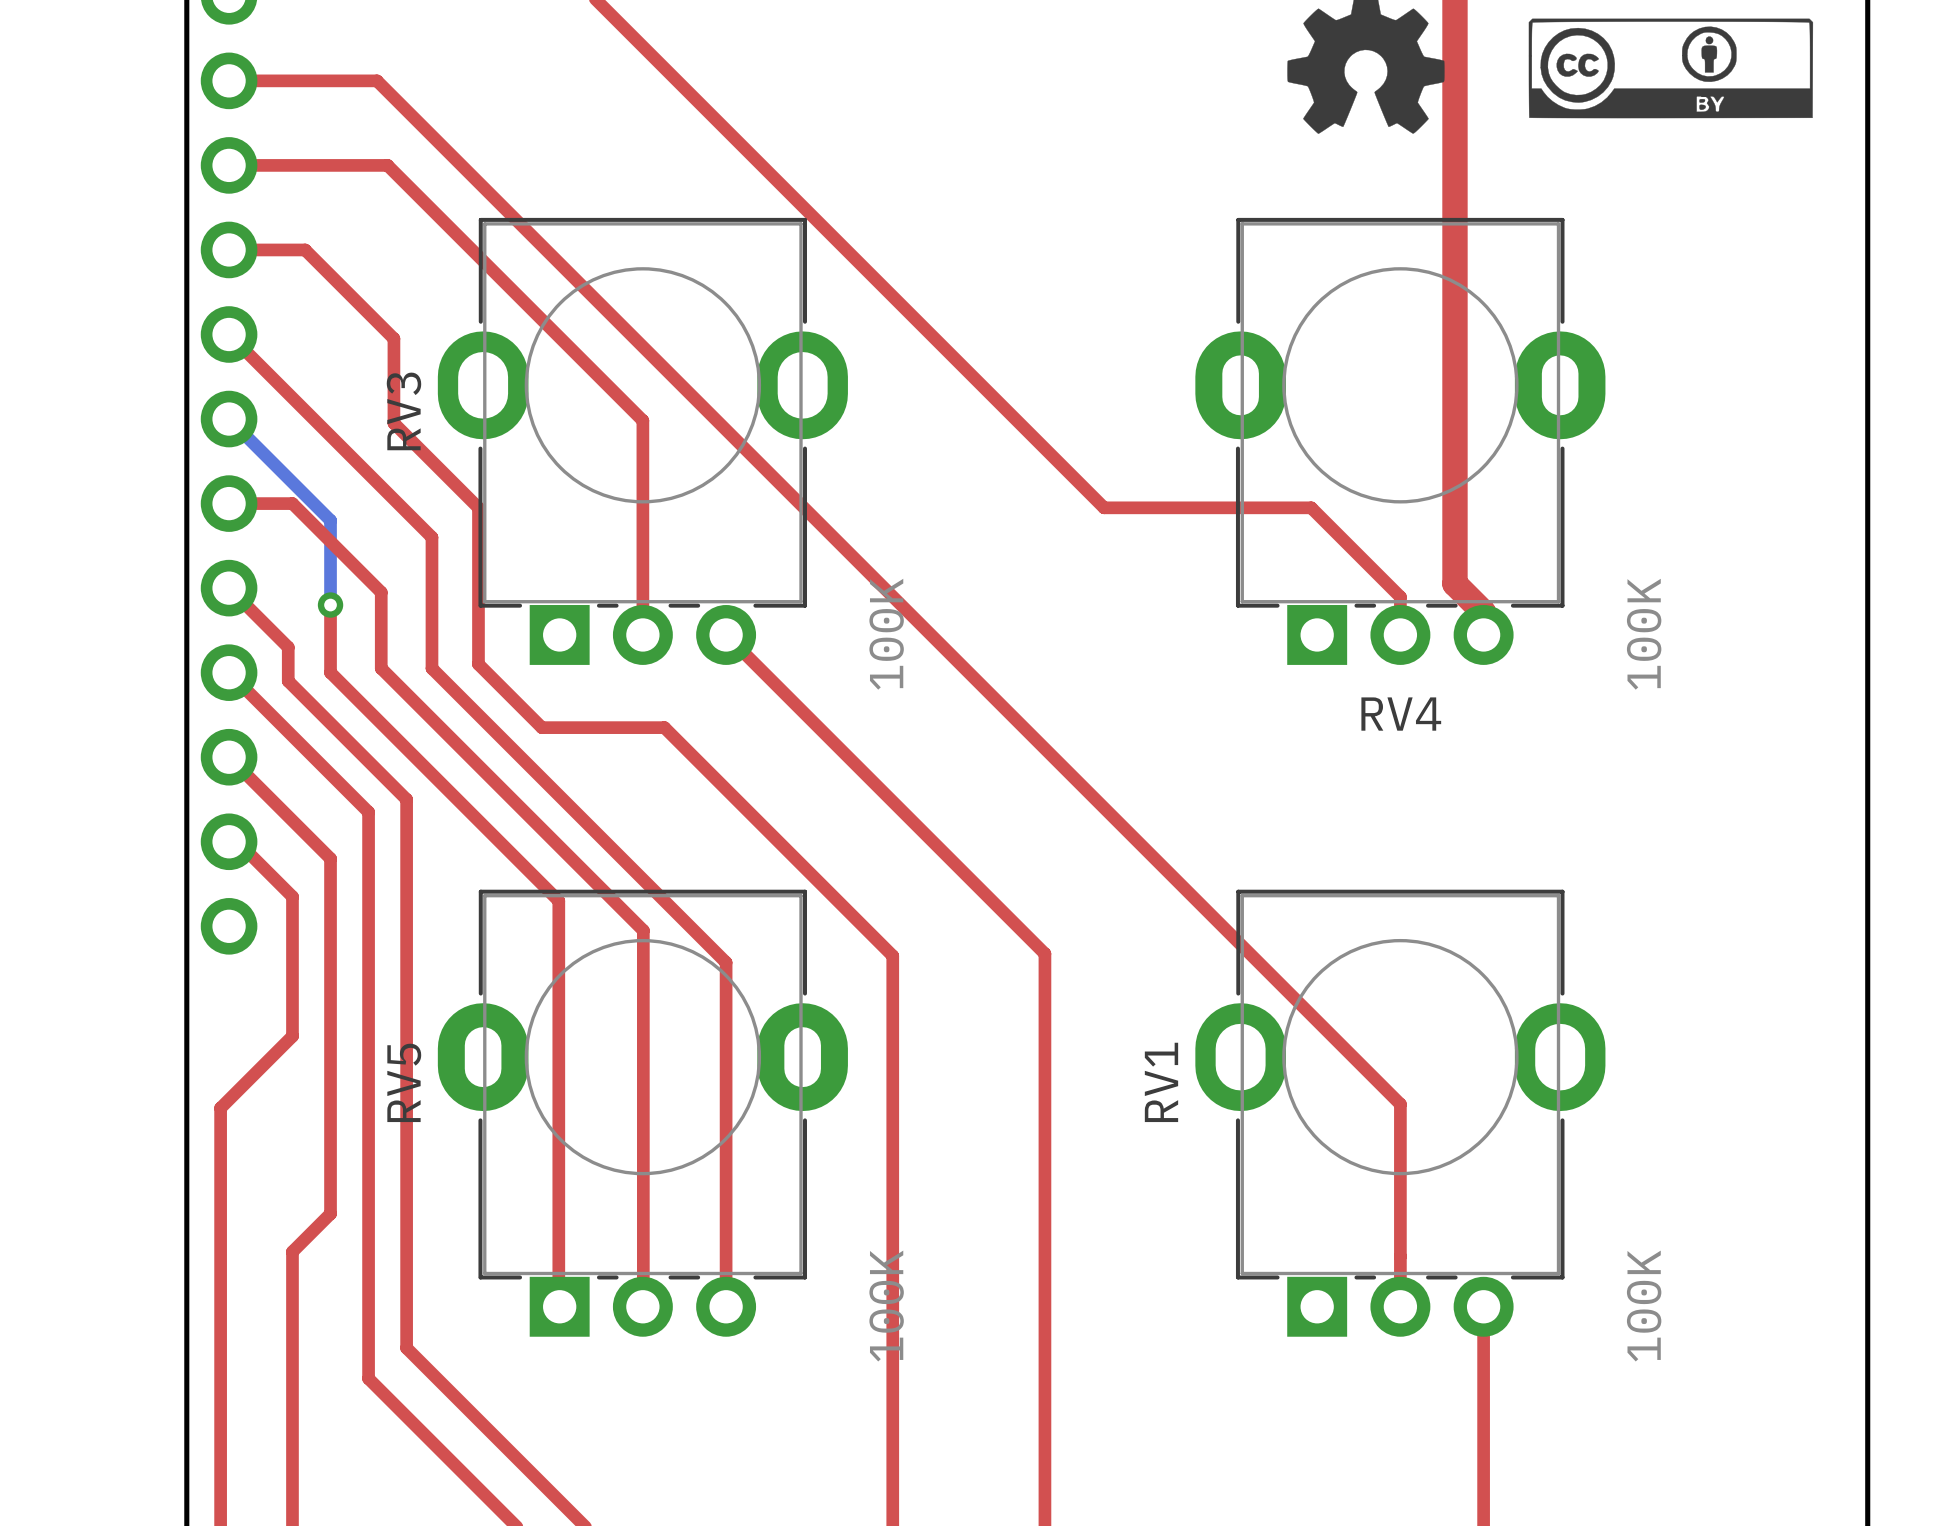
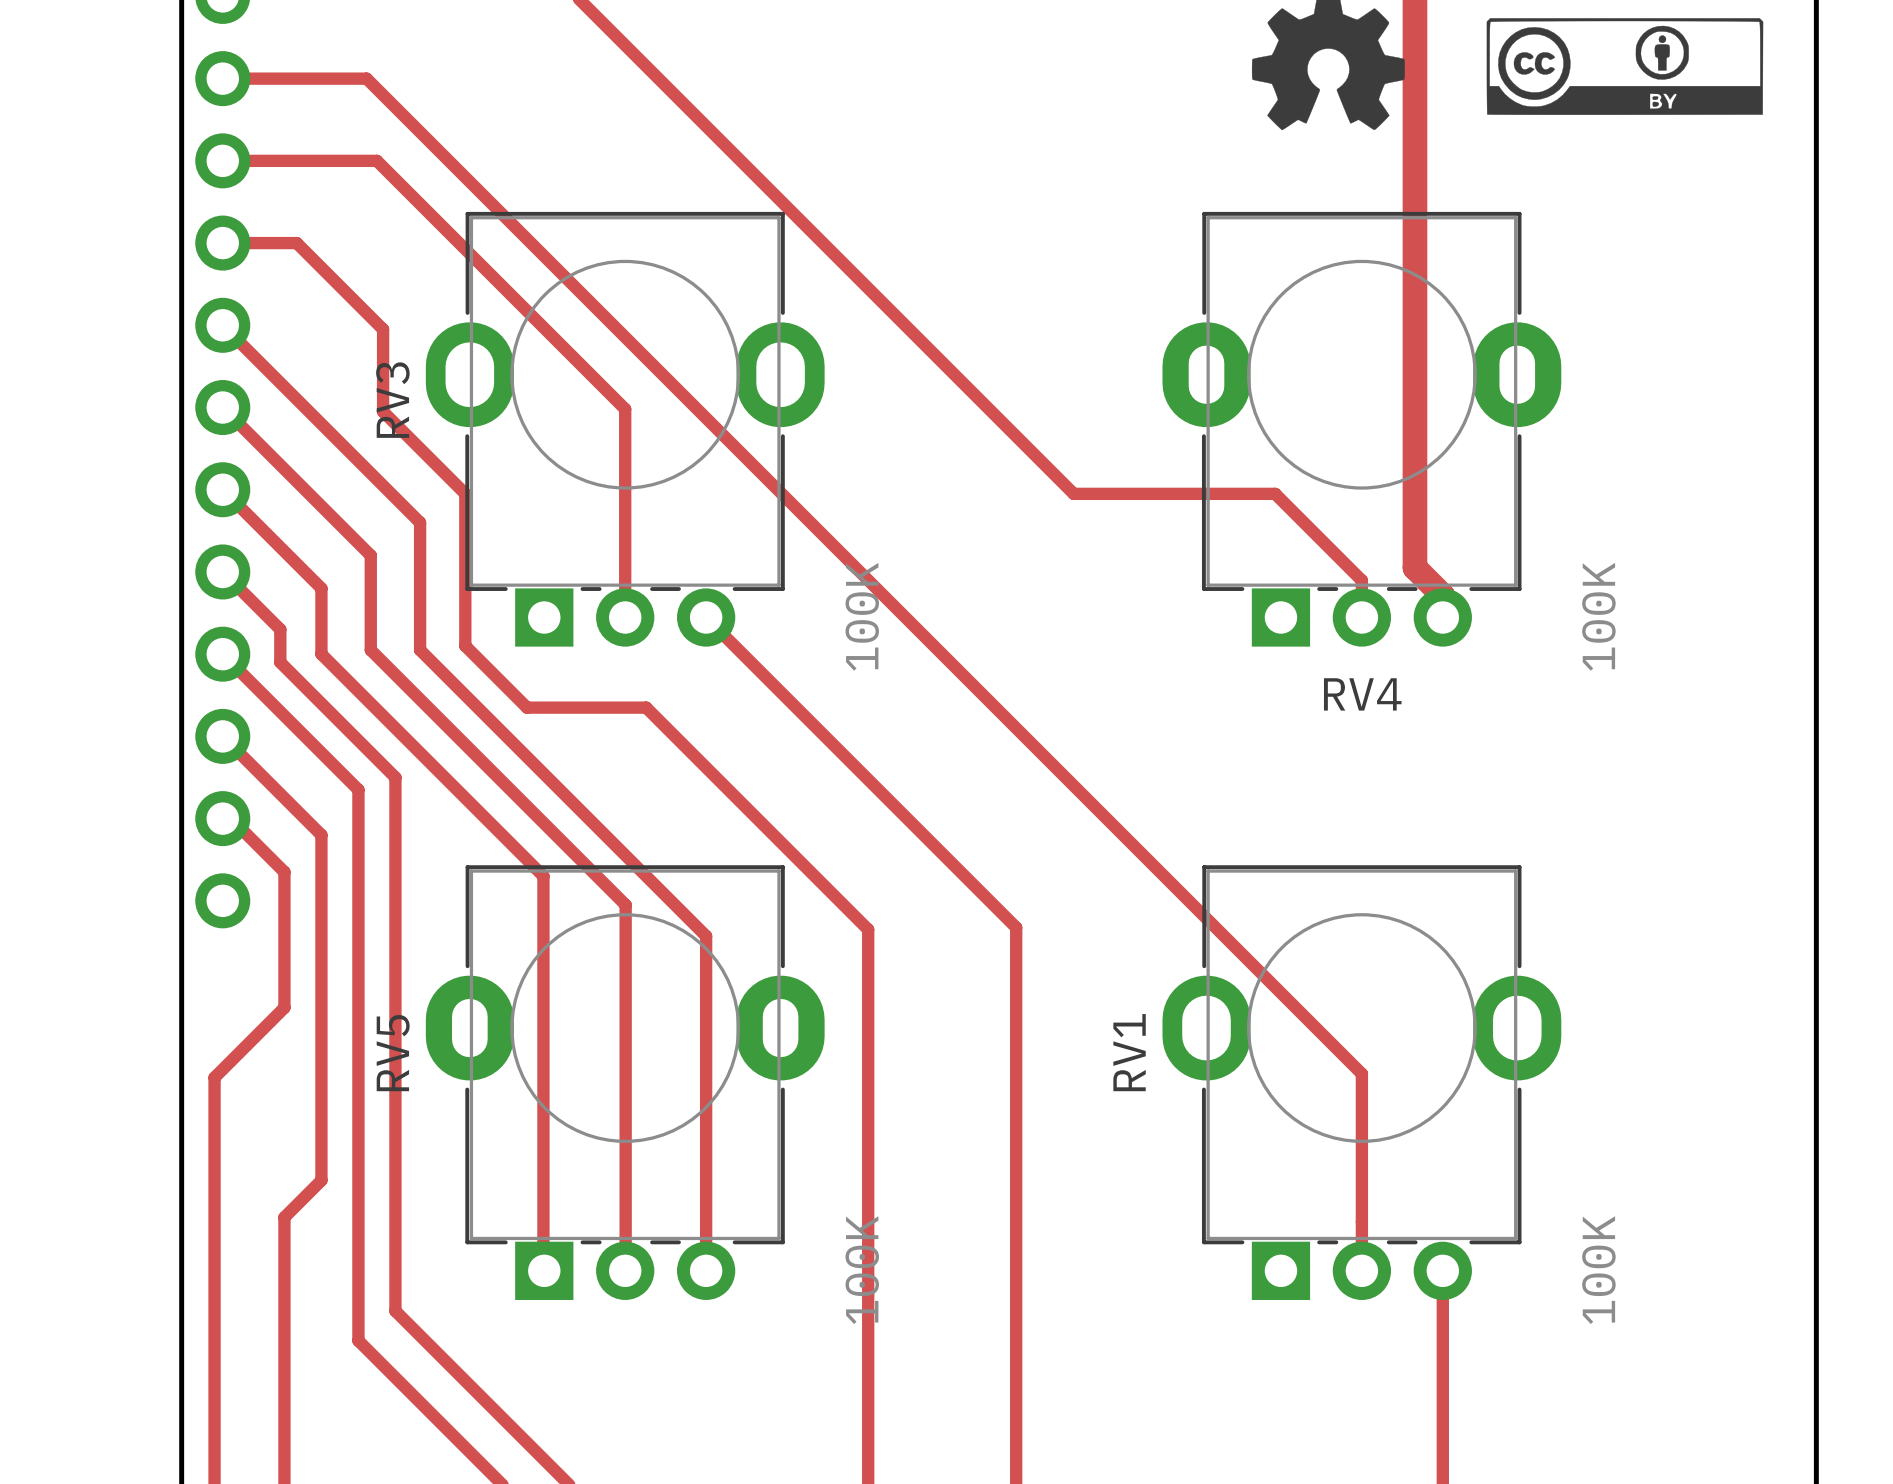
top track: none -> (222, 407) (370, 555) (370, 576)
bottom track: (229, 419) (330, 520) (330, 605) -> none
top track: (229, 503) (292, 503) (381, 592) -> (222, 489) (321, 588)
via: (330, 605) -> none

